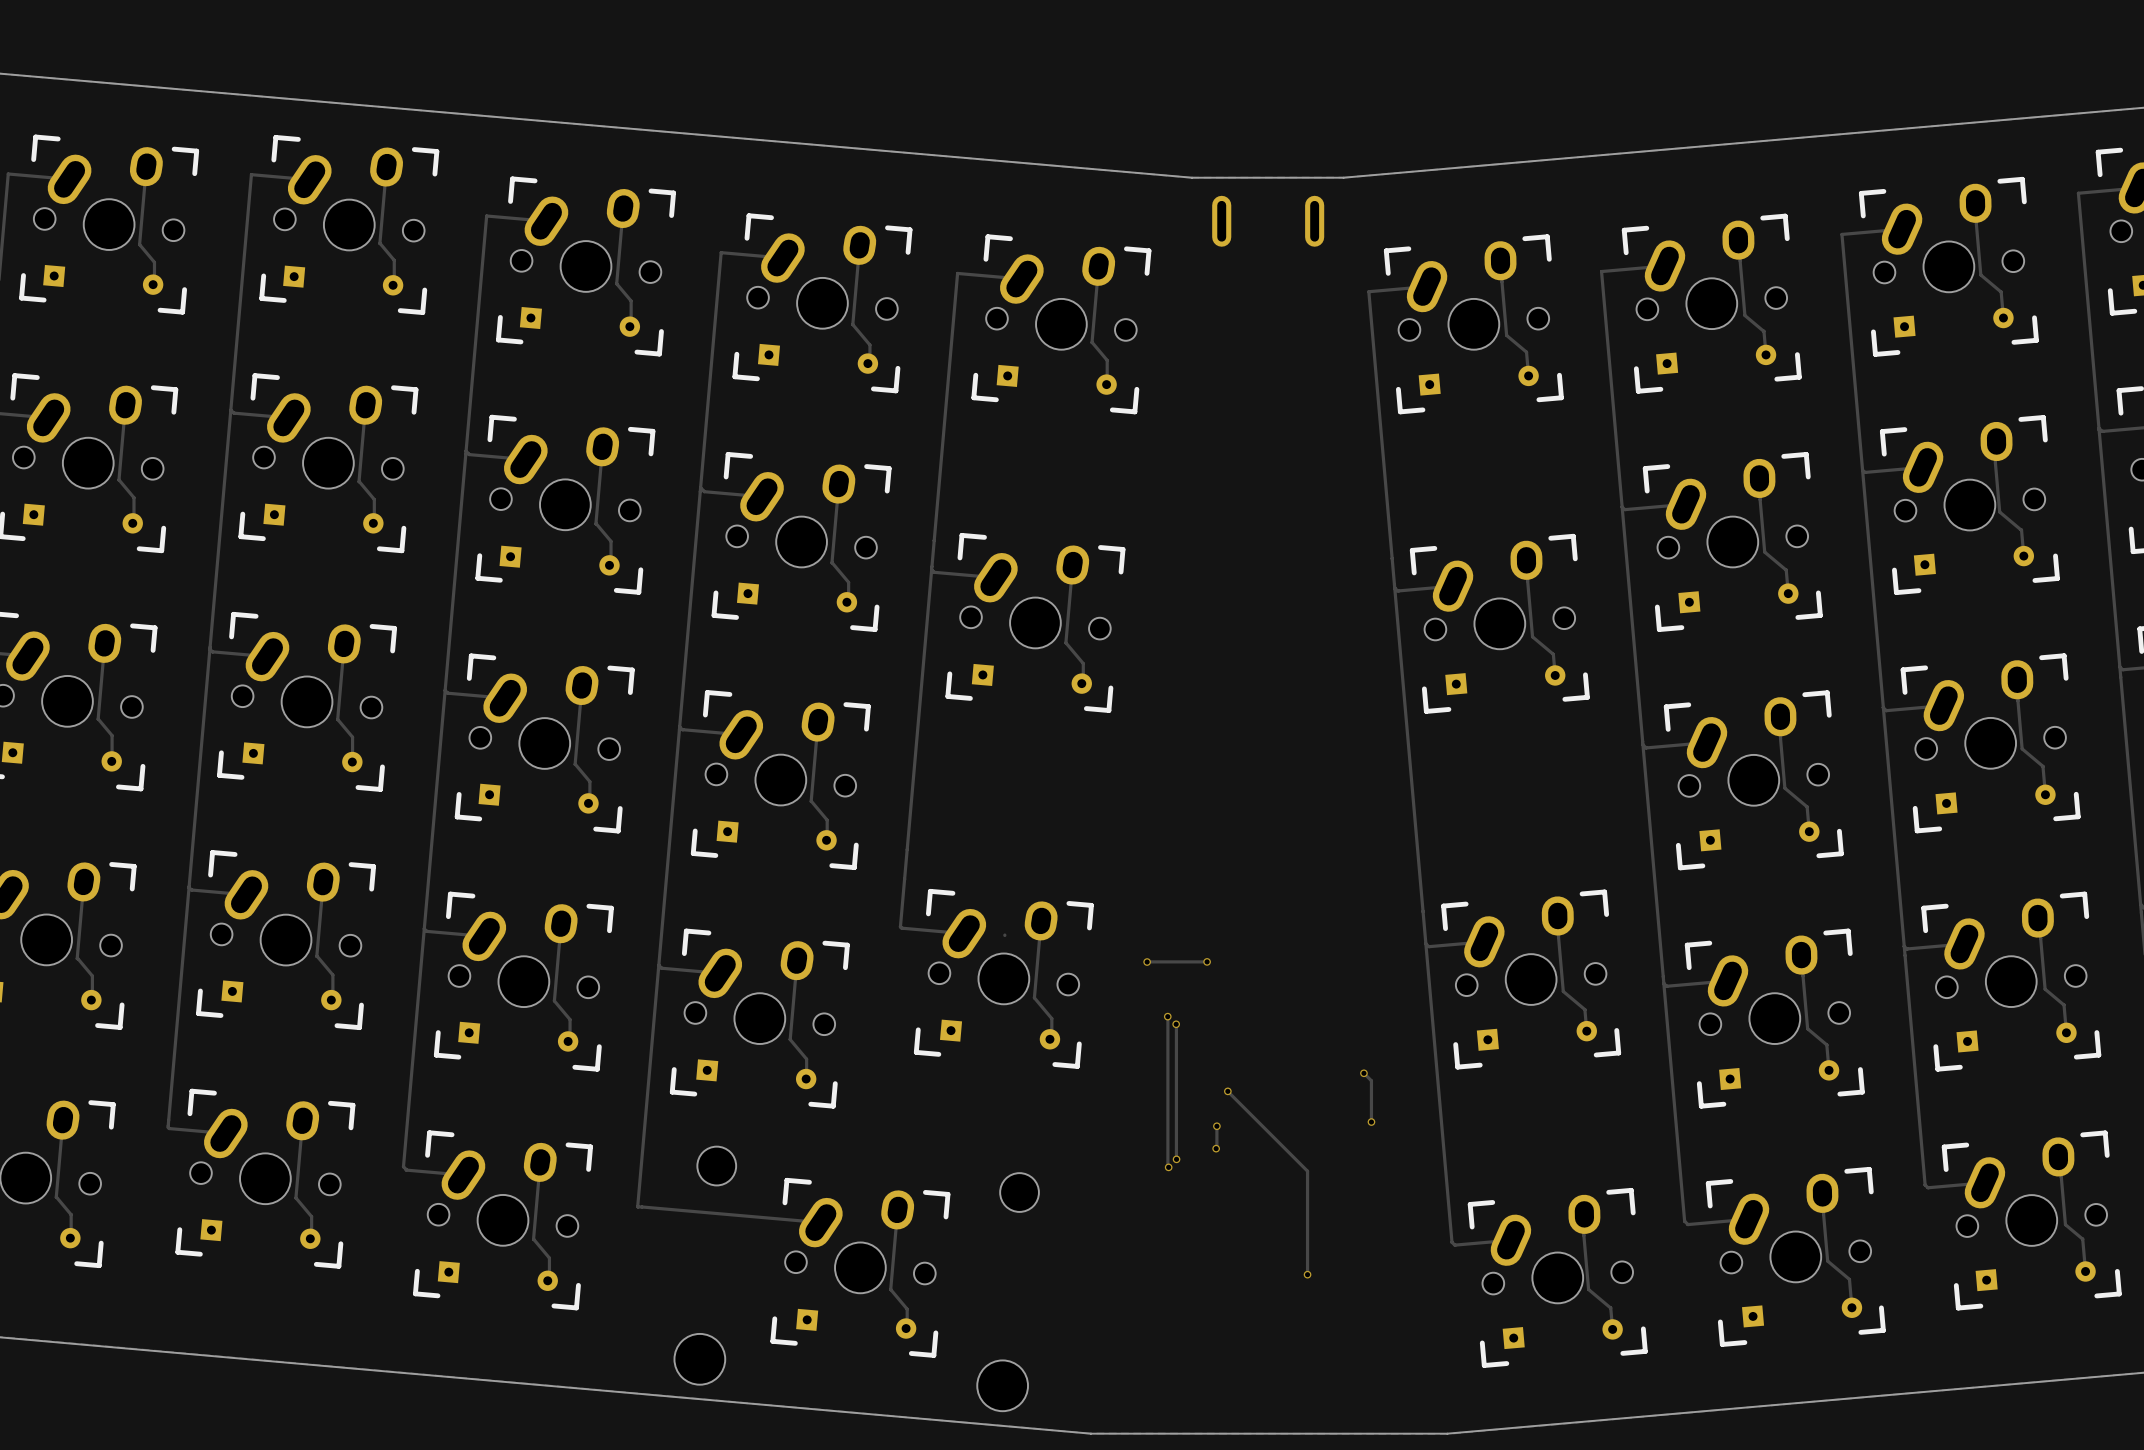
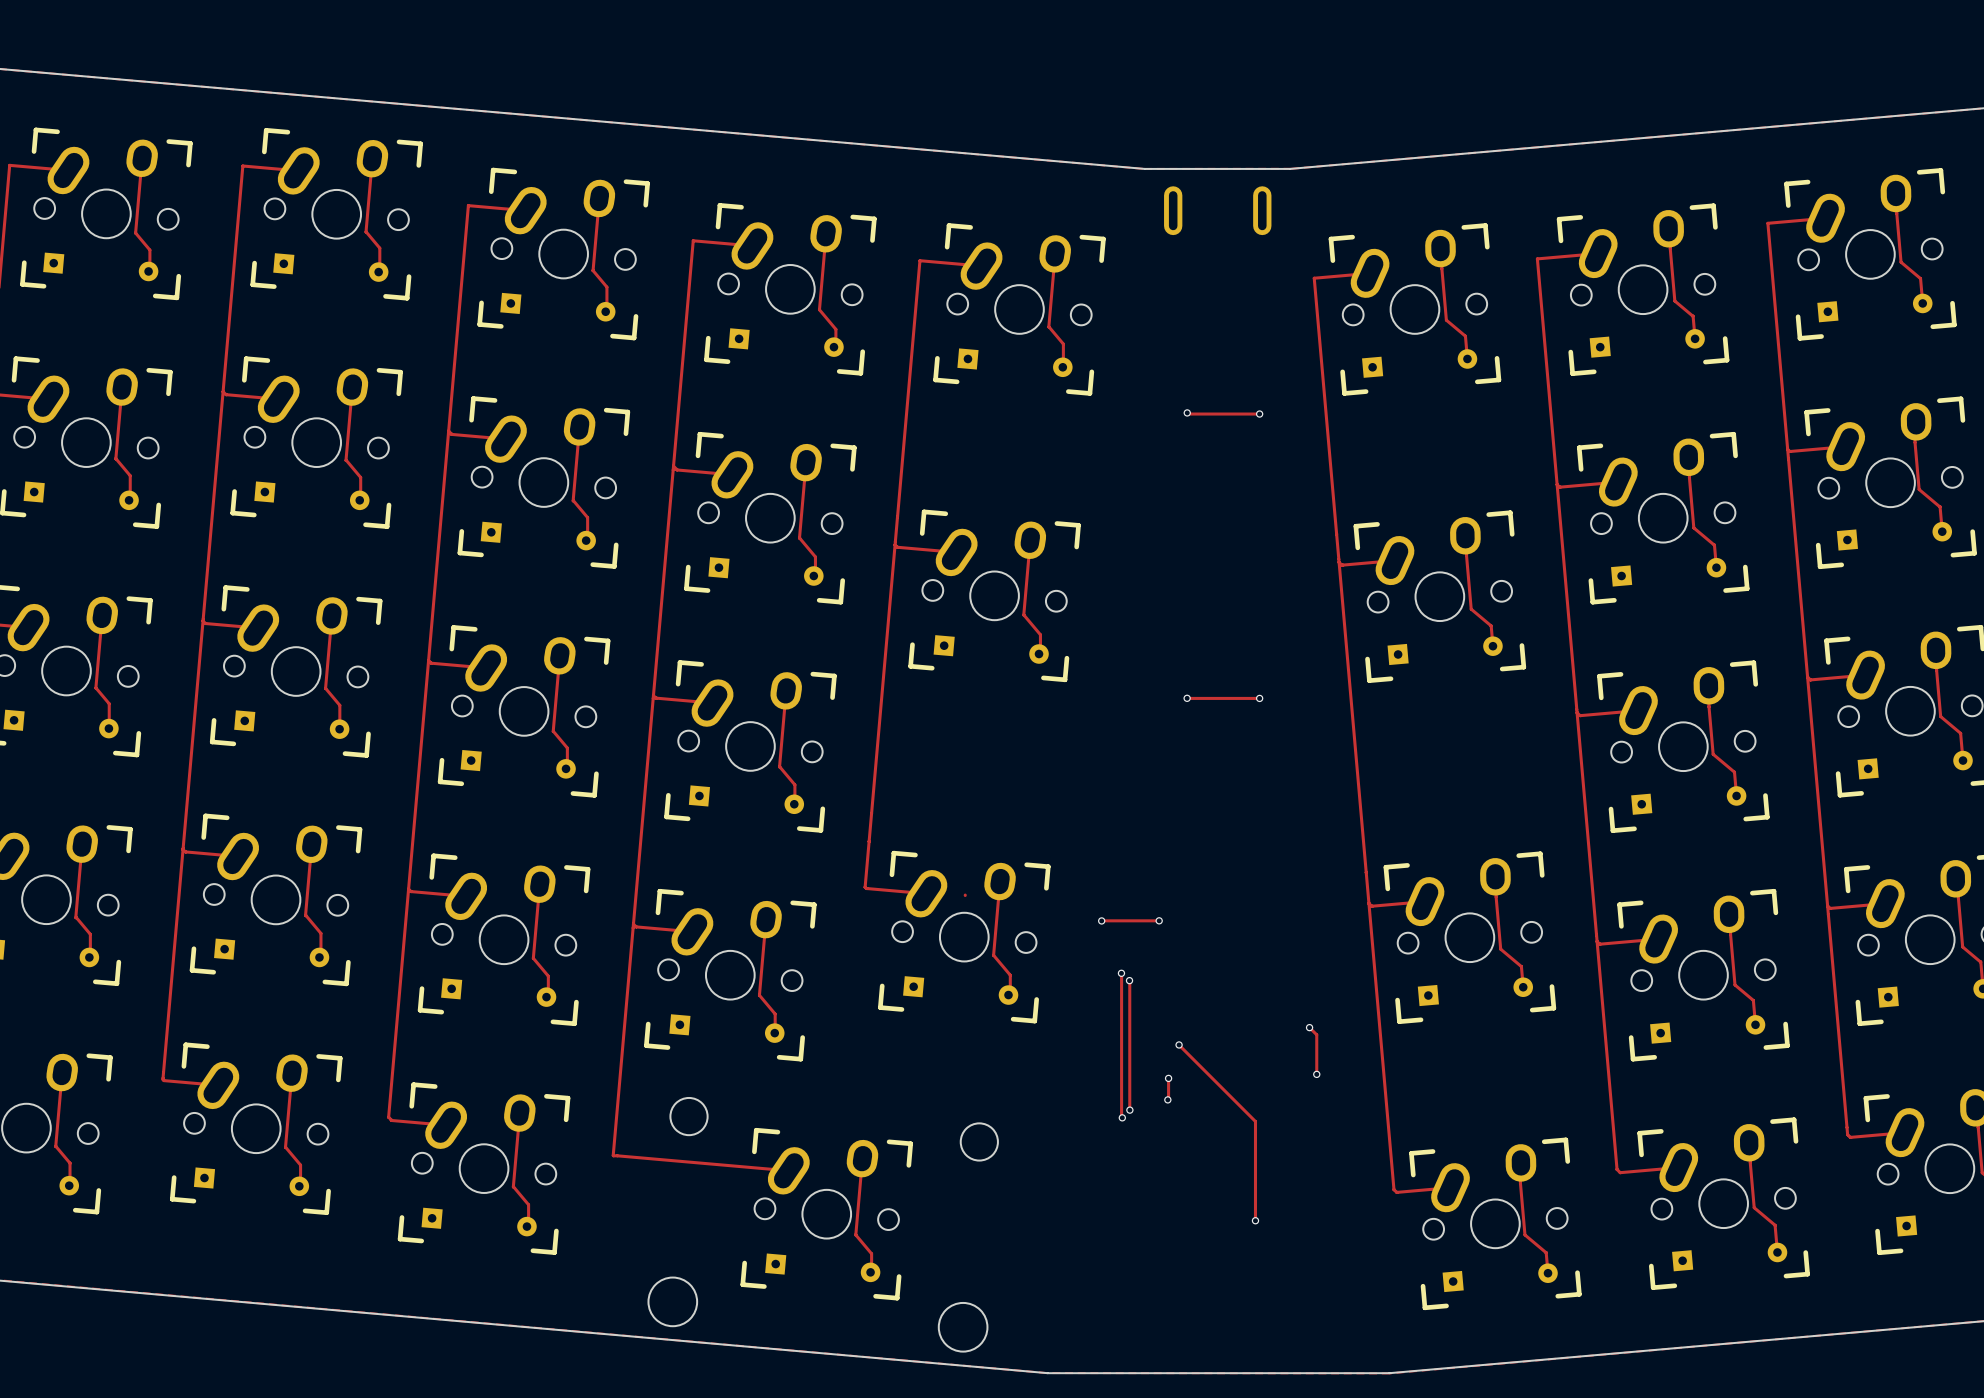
track: none -> (1187, 412) (1259, 414)
via: none -> (1187, 412)
via: none -> (1259, 414)
track: none -> (1187, 698) (1259, 698)
via: none -> (1187, 698)
via: none -> (1259, 698)

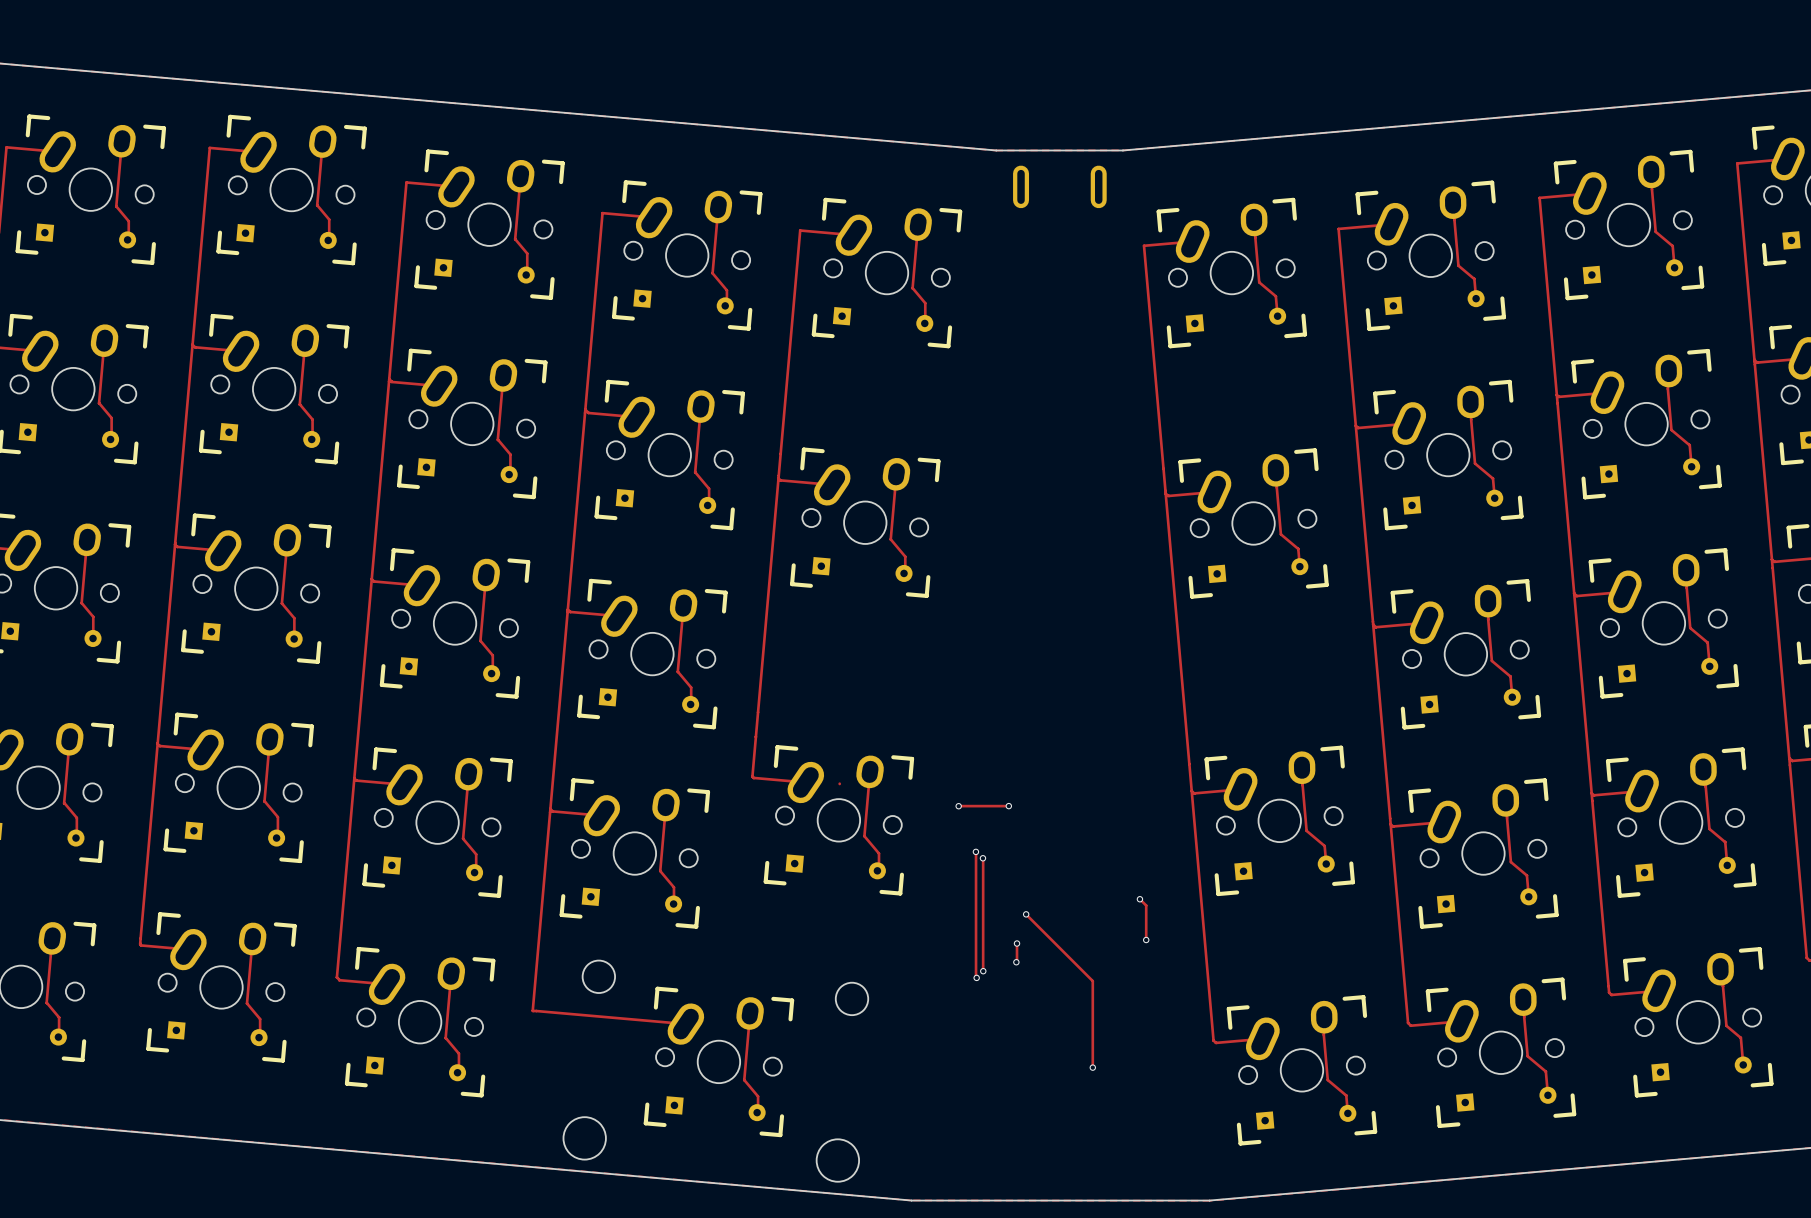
track: (1187, 412) (1259, 414) -> none
via: (1187, 412) -> none
via: (1259, 414) -> none
track: (1187, 698) (1259, 698) -> none
via: (1187, 698) -> none
via: (1259, 698) -> none

